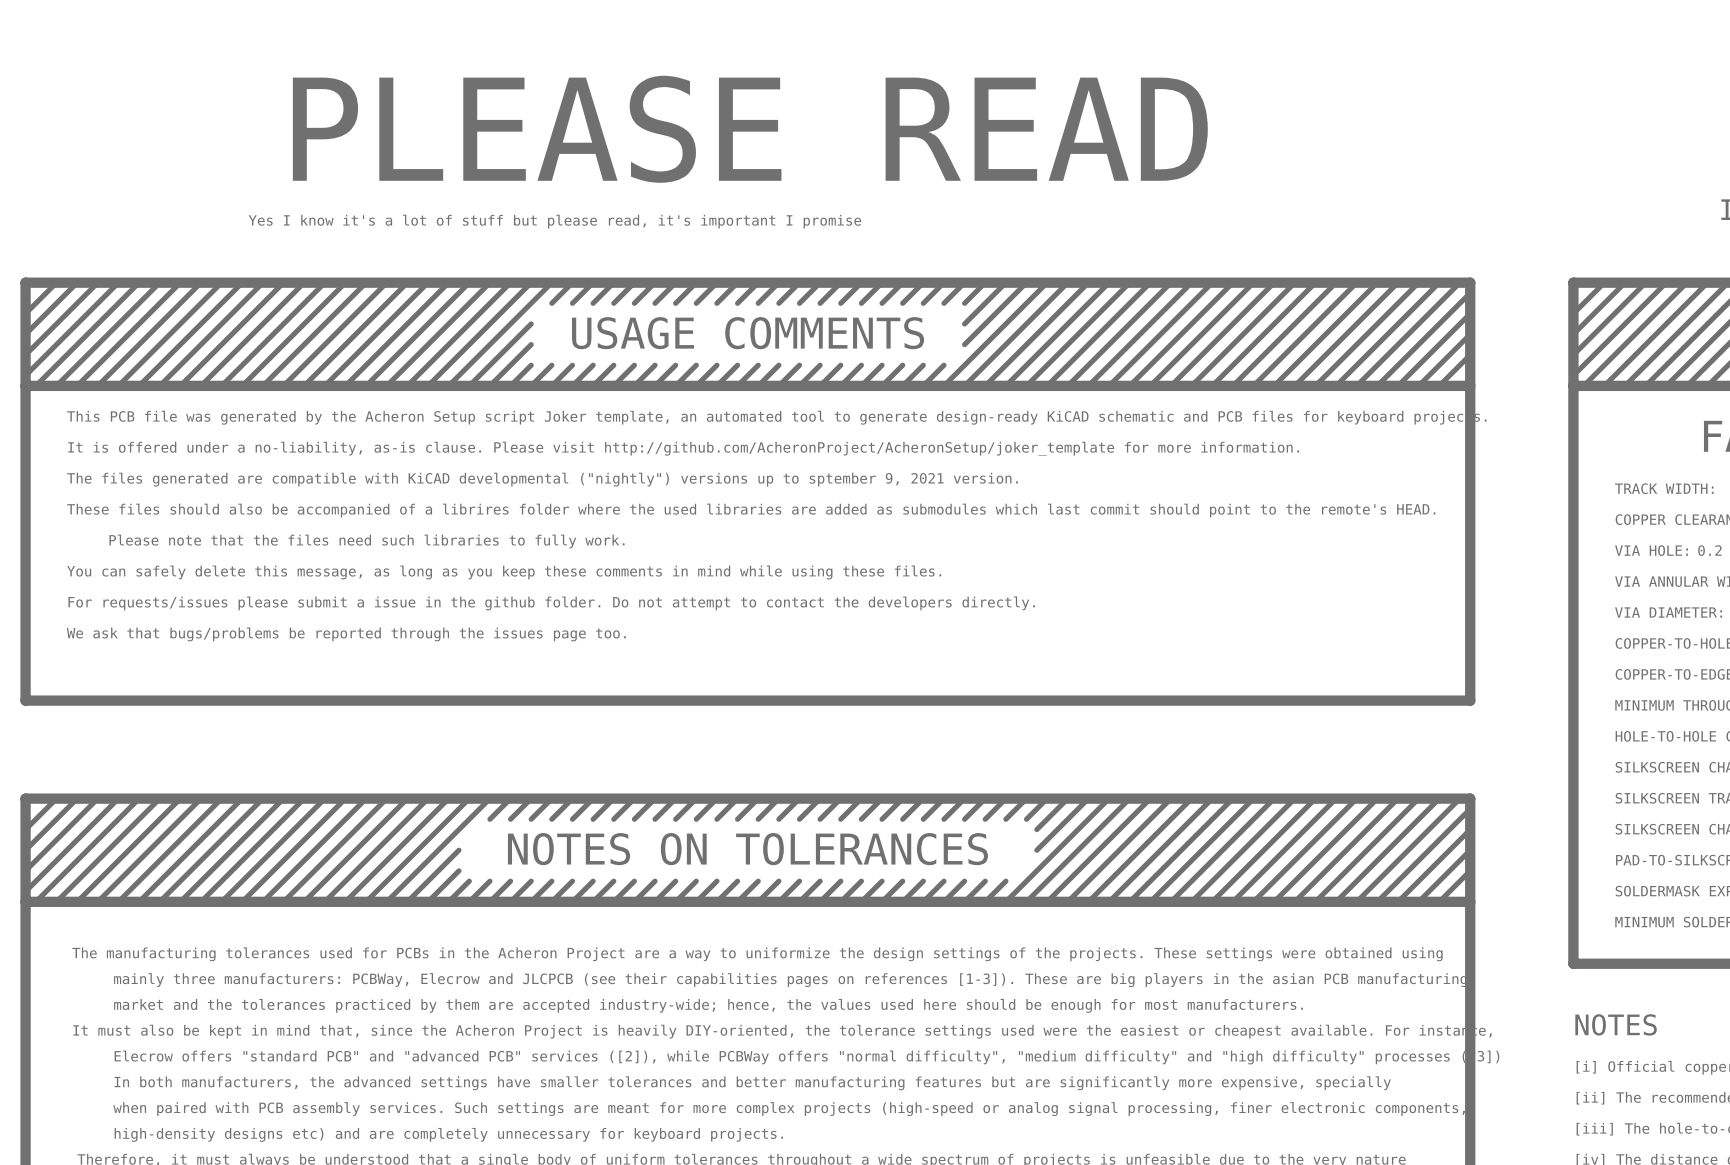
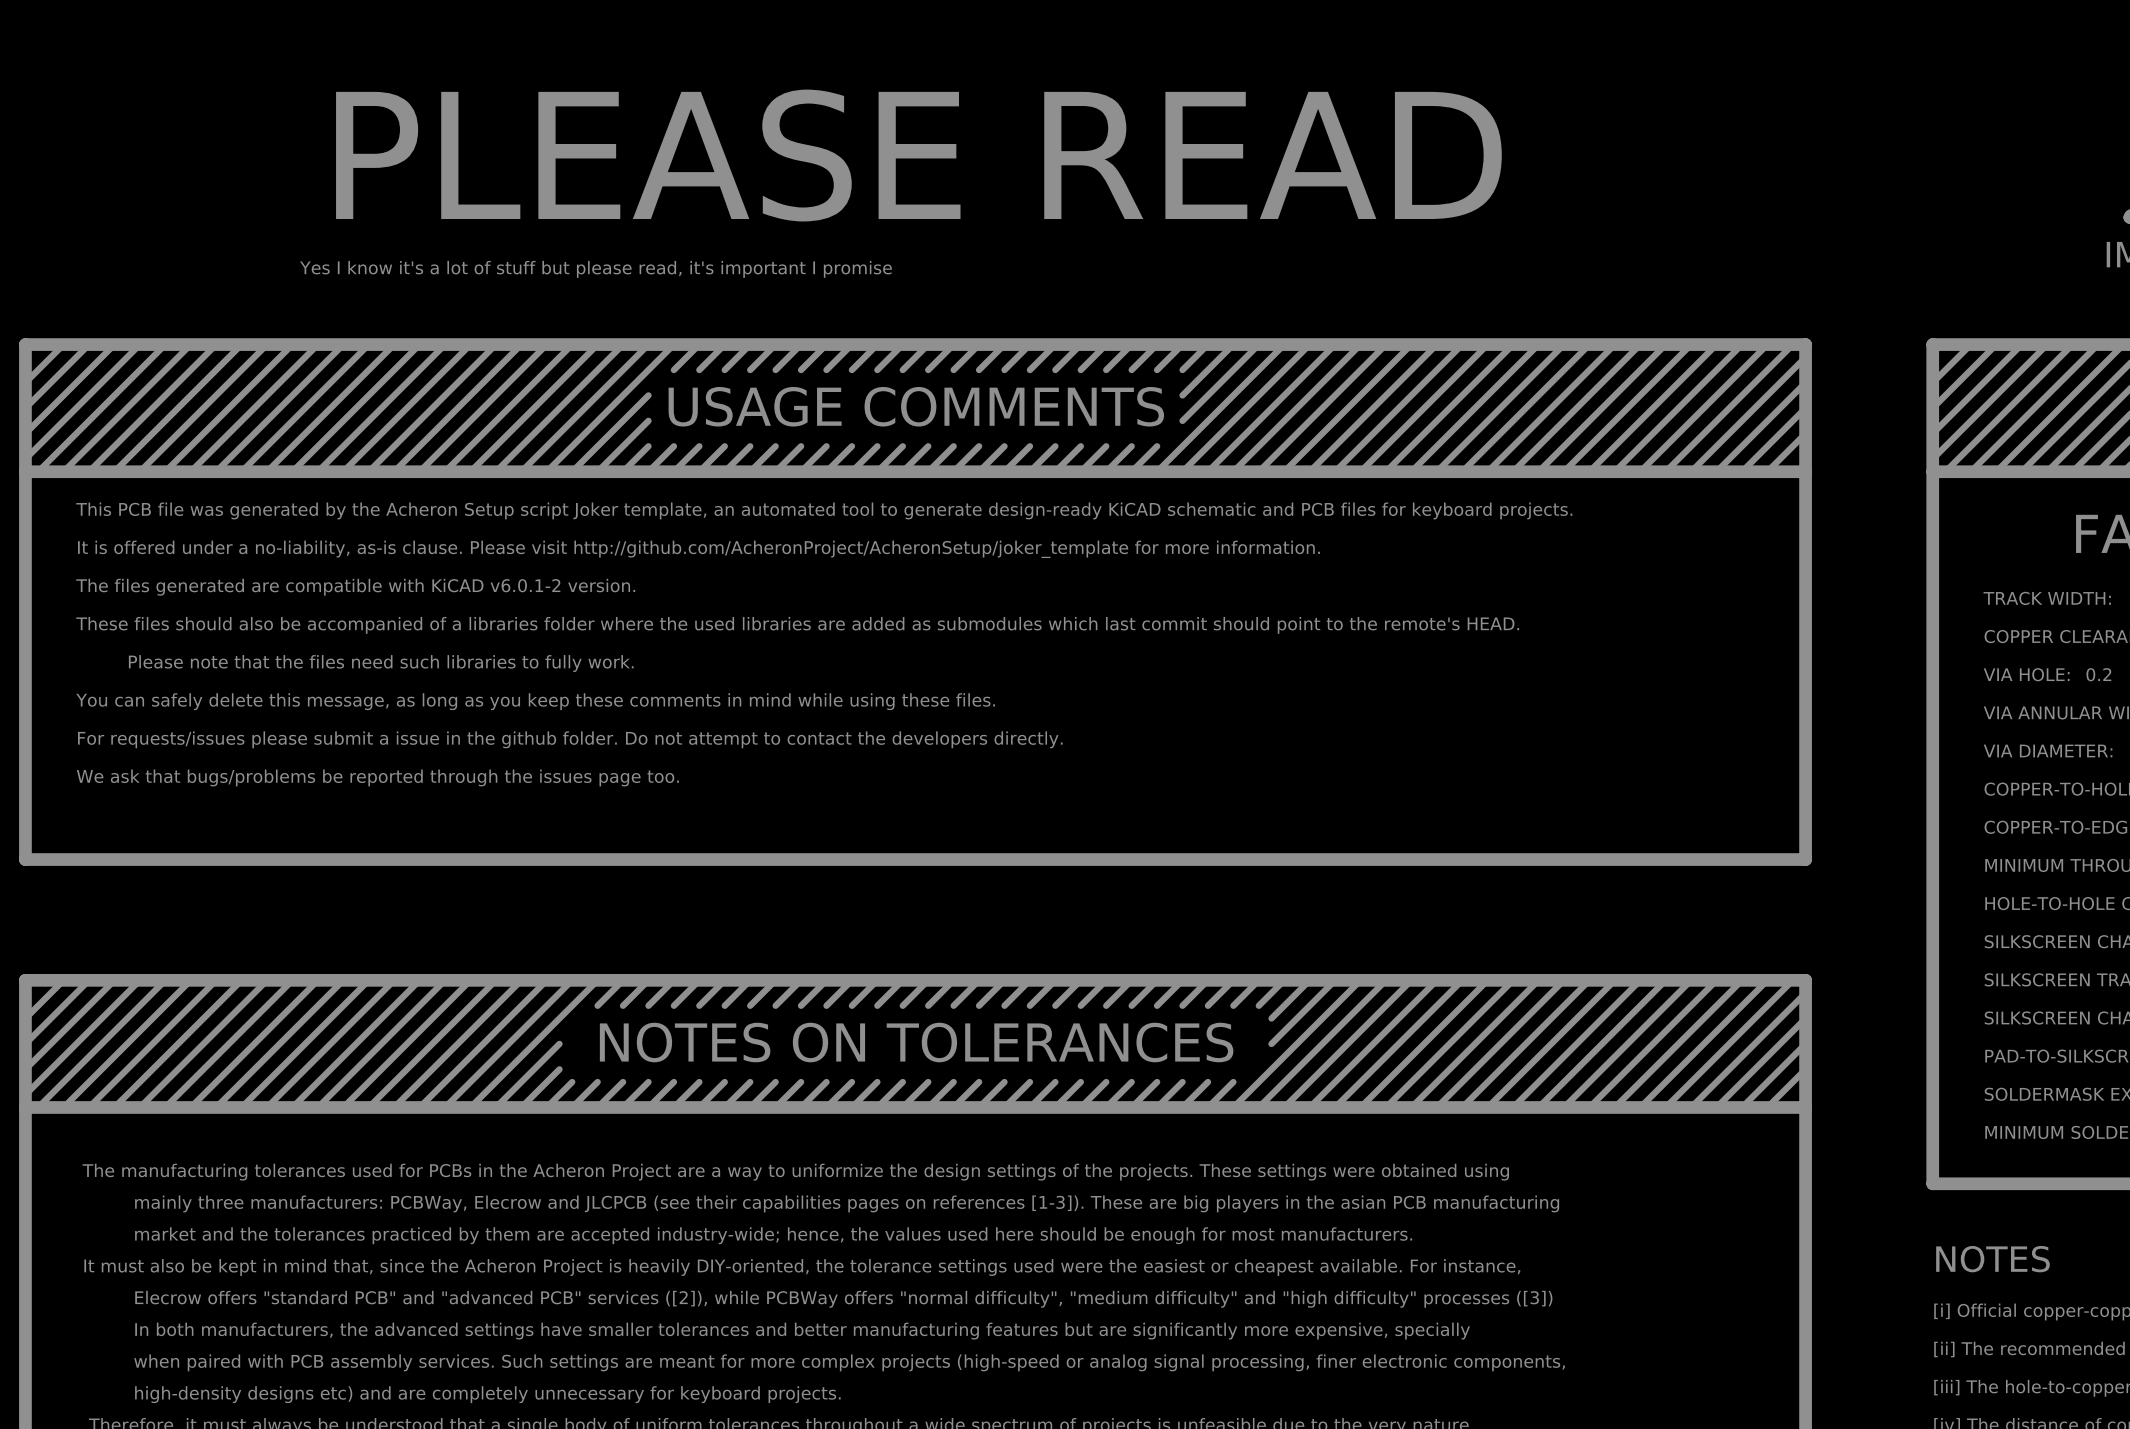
text: The files generated are compatible with KiCAD developmental ("nightly") versions up to sptember 9, 2021 version. (542, 479) -> The files generated are compatible with KiCAD v6.0.1-2 version. (355, 587)
text: These files should also be accompanied of a librires folder where the used libraries are added as submodules which last commit should point to the remote's HEAD. (751, 510) -> These files should also be accompanied of a libraries folder where the used libraries are added as submodules which last commit should point to the remote's HEAD. (797, 625)

